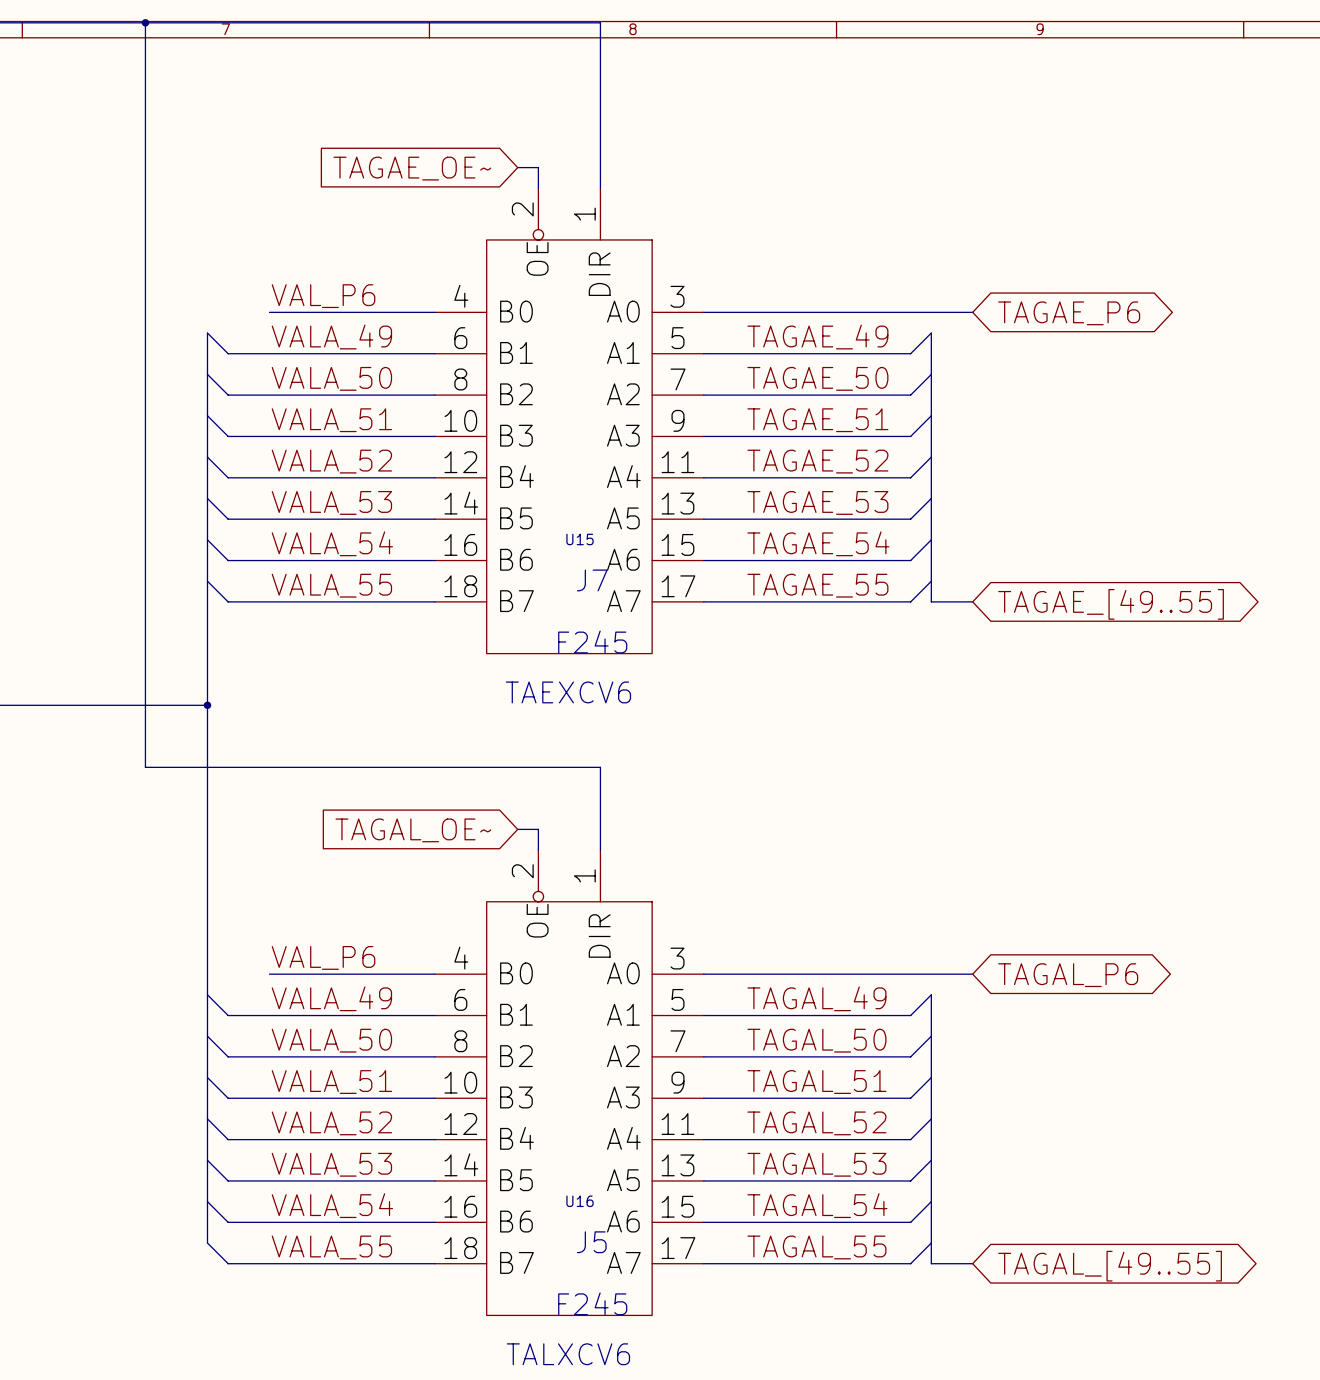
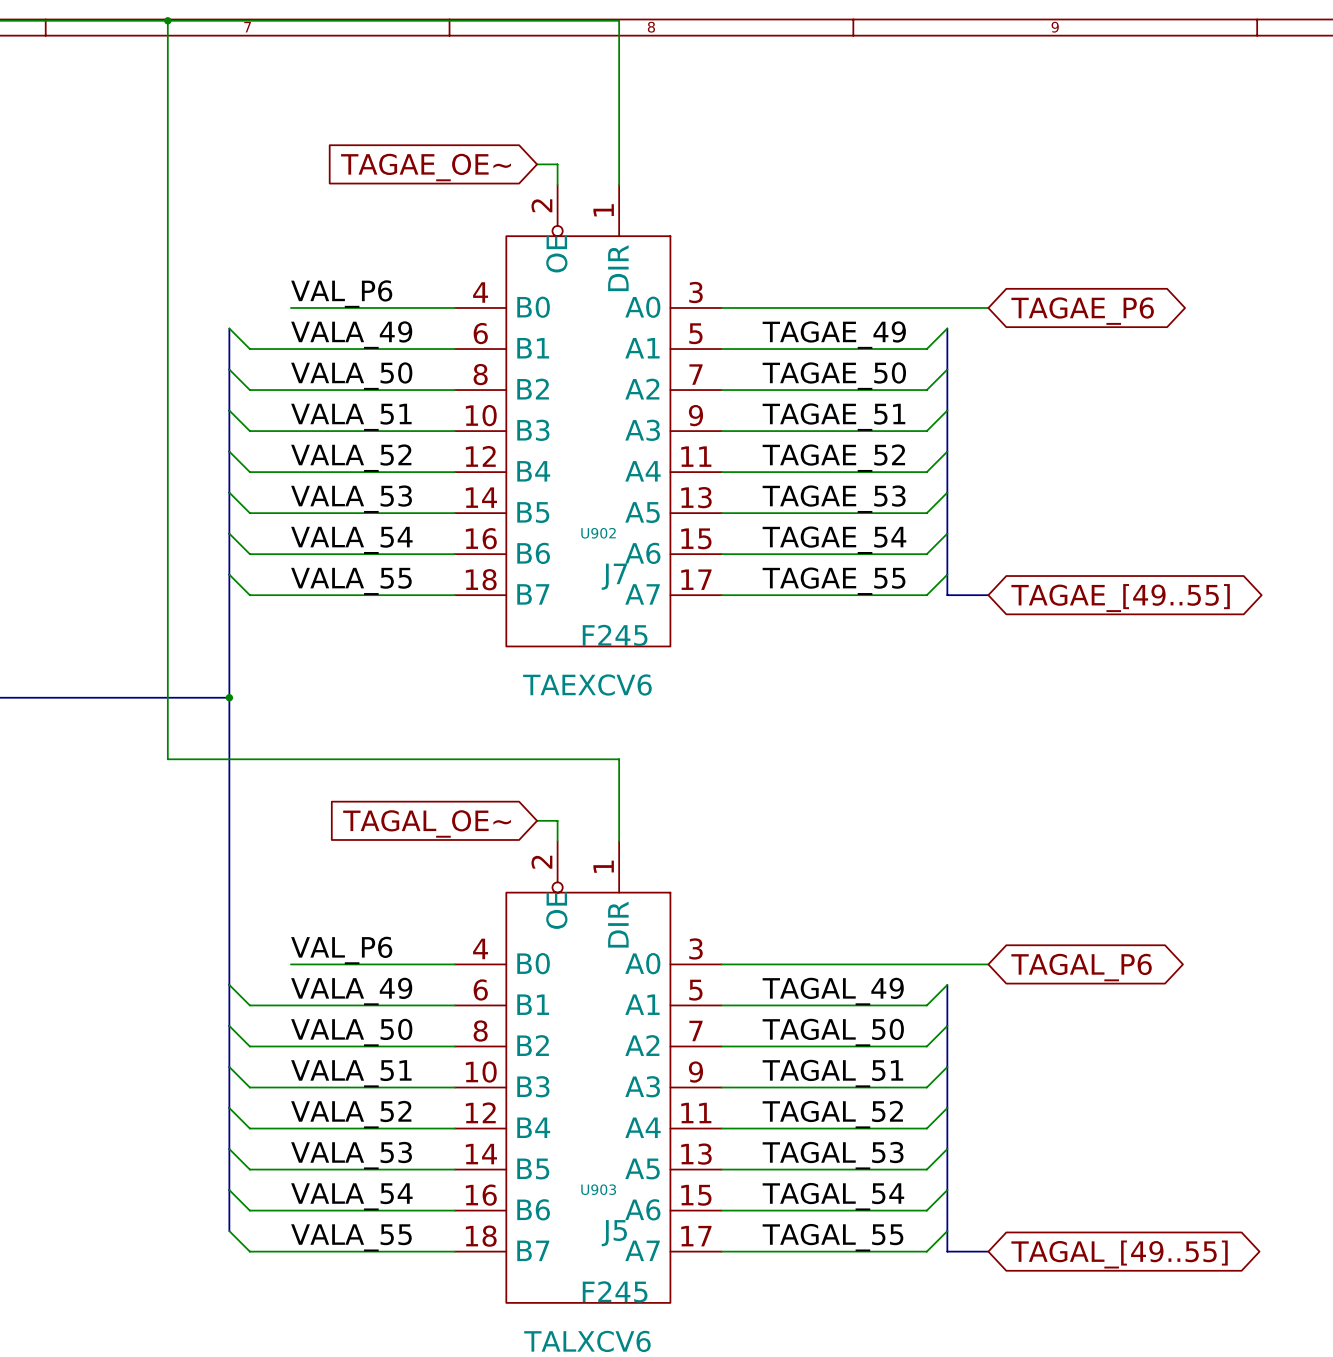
U15 name: U15 (579, 539) -> U902 (598, 533)
U16 name: U16 (579, 1201) -> U903 (598, 1189)

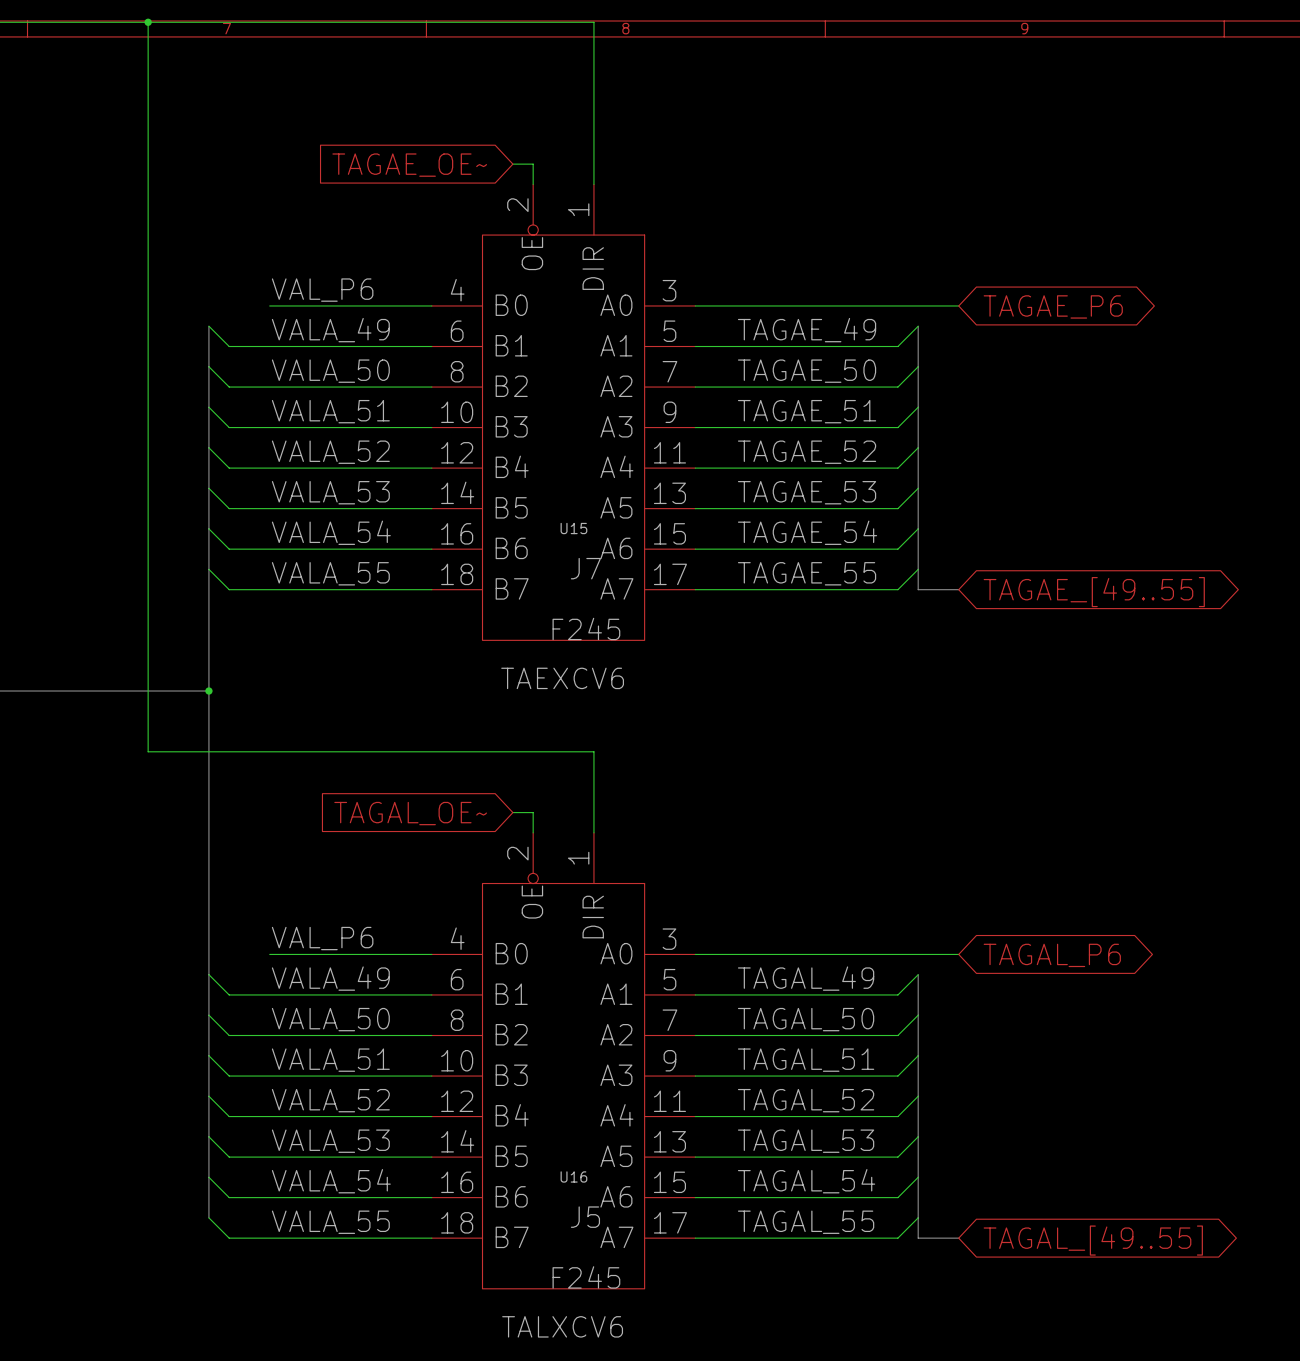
U902 name: U902 (598, 533) -> U15 (573, 528)
U903 name: U903 (598, 1189) -> U16 (573, 1176)

